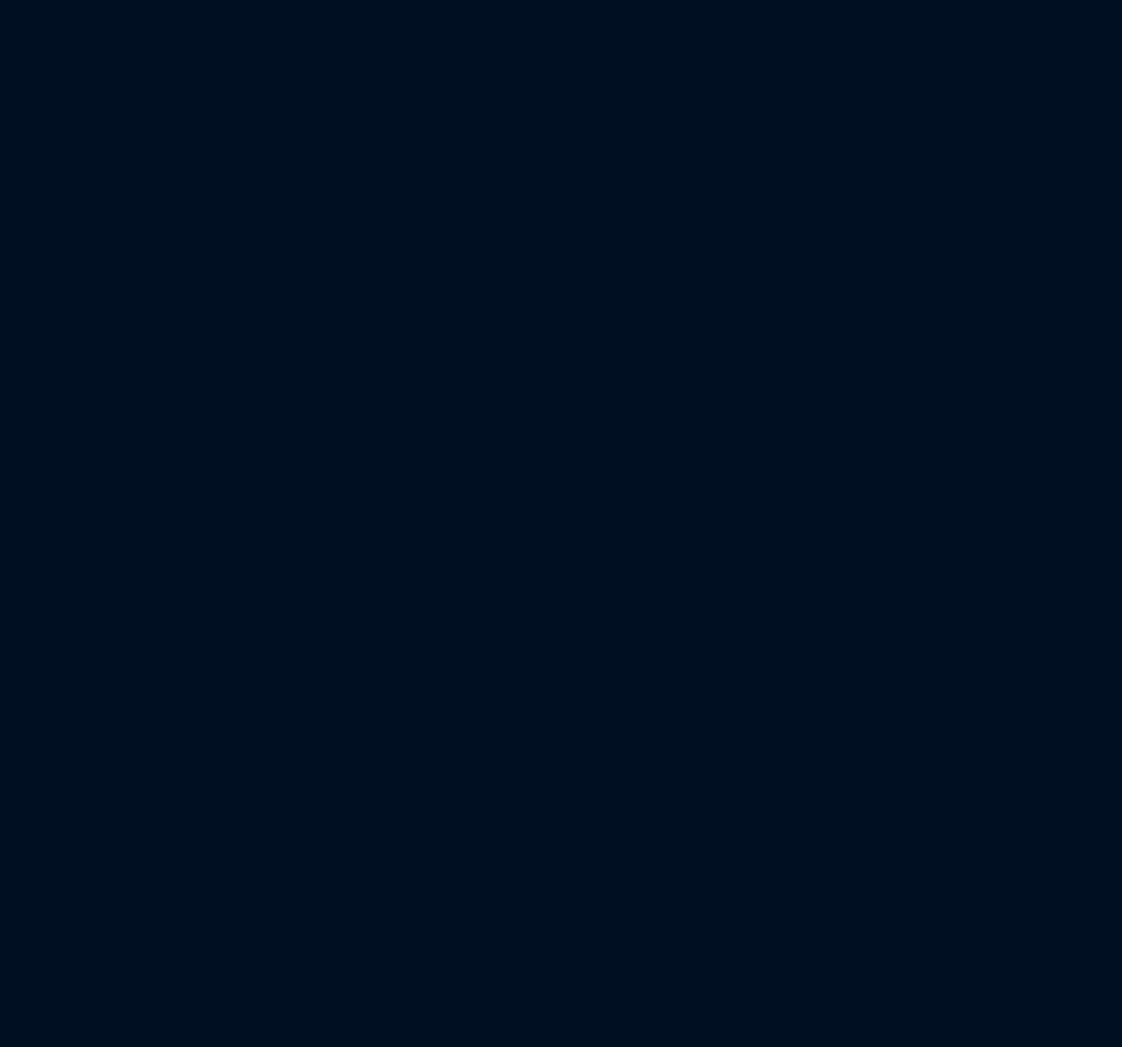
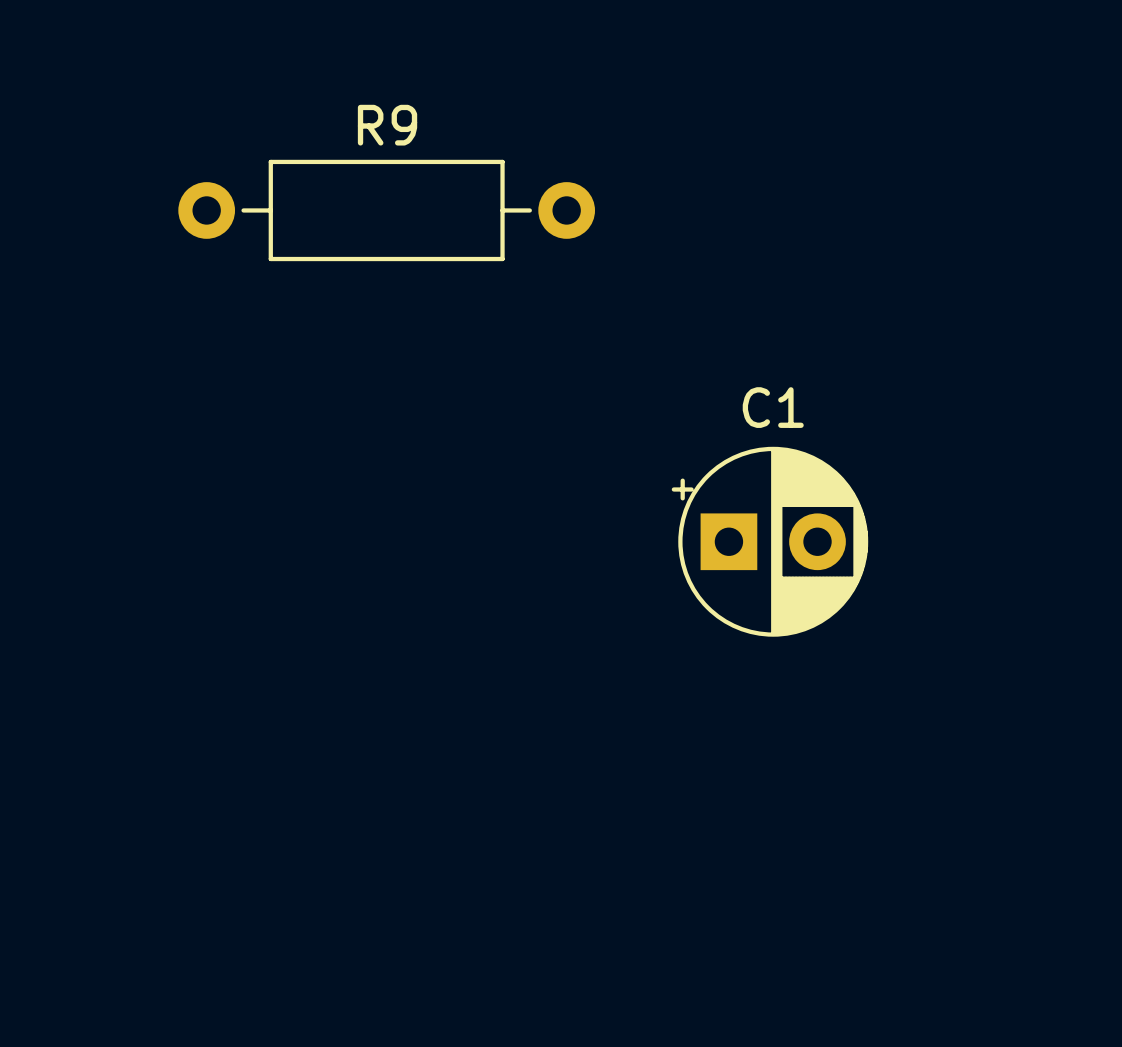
R9: none -> (386, 210)
C1: none -> (769, 541)

